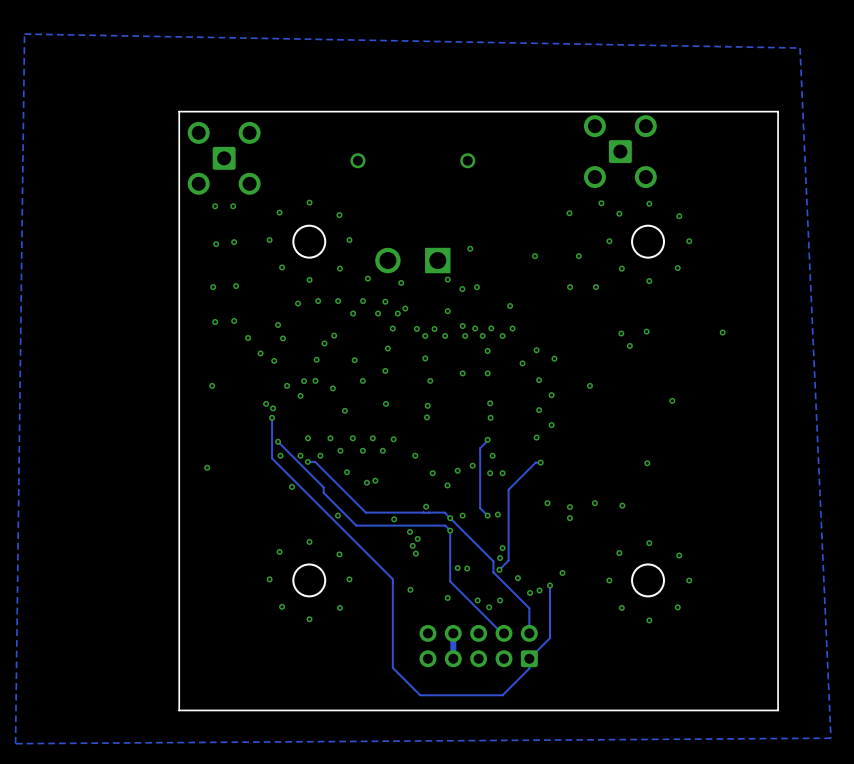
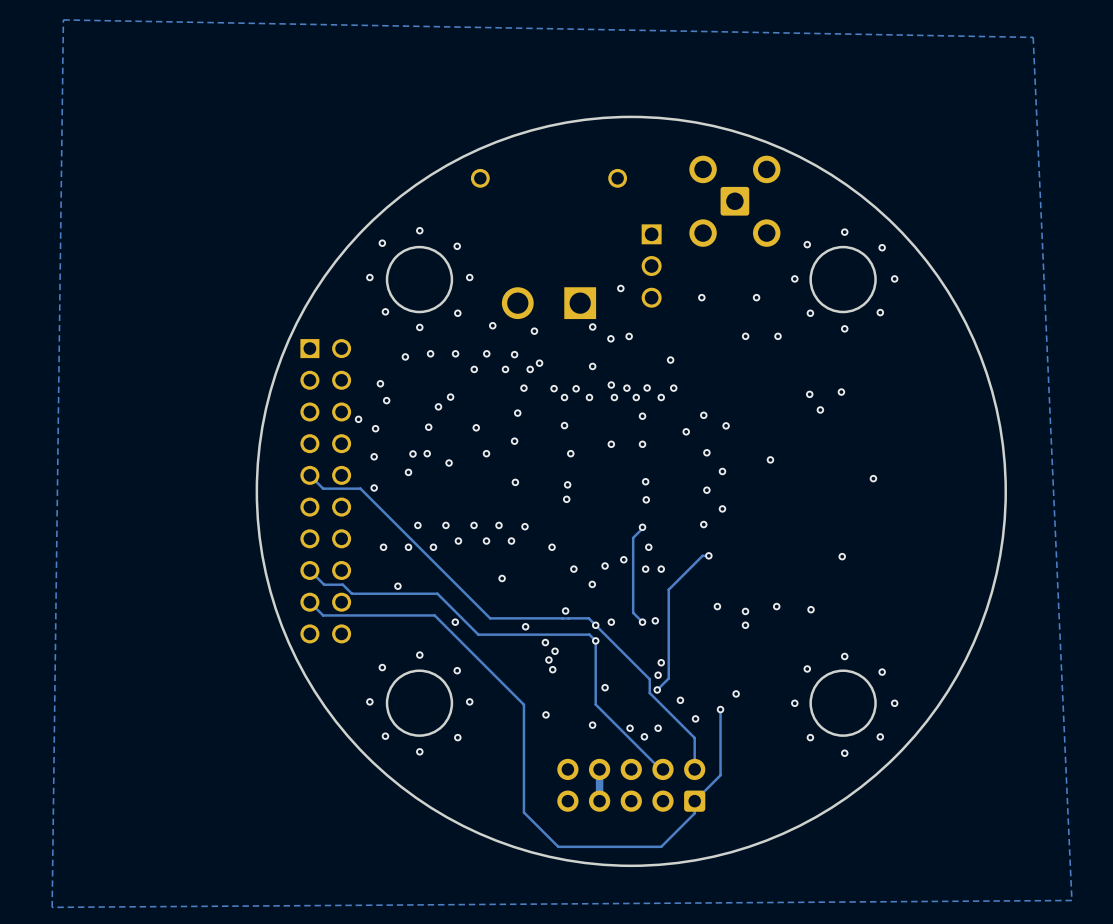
round board edge: none -> [255, 115, 1007, 868]
board edge: (778, 111) (179, 111) (179, 710) (778, 710) (778, 111) -> none
part position: (620, 151) -> (734, 201)
part: (224, 158) -> none
via: (601, 203) -> none
via: (215, 206) -> none
via: (233, 206) -> none
via: (569, 213) -> none
round board edge size: [292, 224, 327, 259] -> [385, 245, 454, 314]
round board edge size: [631, 224, 665, 259] -> [809, 245, 877, 314]
part: none -> (651, 266)
via: (234, 242) -> none
via: (216, 244) -> none
via: (236, 286) -> none
via: (213, 287) -> none
via: (234, 321) -> none
via: (215, 322) -> none
via: (722, 332) -> none
via: (248, 337) -> none
via: none -> (374, 456)
via: (212, 385) -> none
via: (287, 385) -> none
via: (266, 403) -> none
part: none -> (325, 491)
via: (344, 410) -> none
track: (272, 417) (272, 458) (392, 579) (392, 581) -> (309, 602) (323, 615) (434, 615) (523, 704)
via: (272, 417) -> none
track: (278, 441) (323, 487) (323, 492) -> (309, 570) (324, 584) (342, 584) (351, 593) (437, 593)
via: (278, 441) -> none
via: (307, 461) -> none
track: (315, 461) (307, 461) -> (426, 554) (360, 488) (323, 488) (309, 475)
via: (207, 467) -> none
via: (347, 472) -> none
via: (366, 482) -> none
round board edge size: [292, 563, 327, 598] -> [385, 669, 454, 737]
round board edge size: [631, 563, 665, 598] -> [809, 669, 877, 737]
via: (467, 568) -> none
via: (539, 590) -> none

